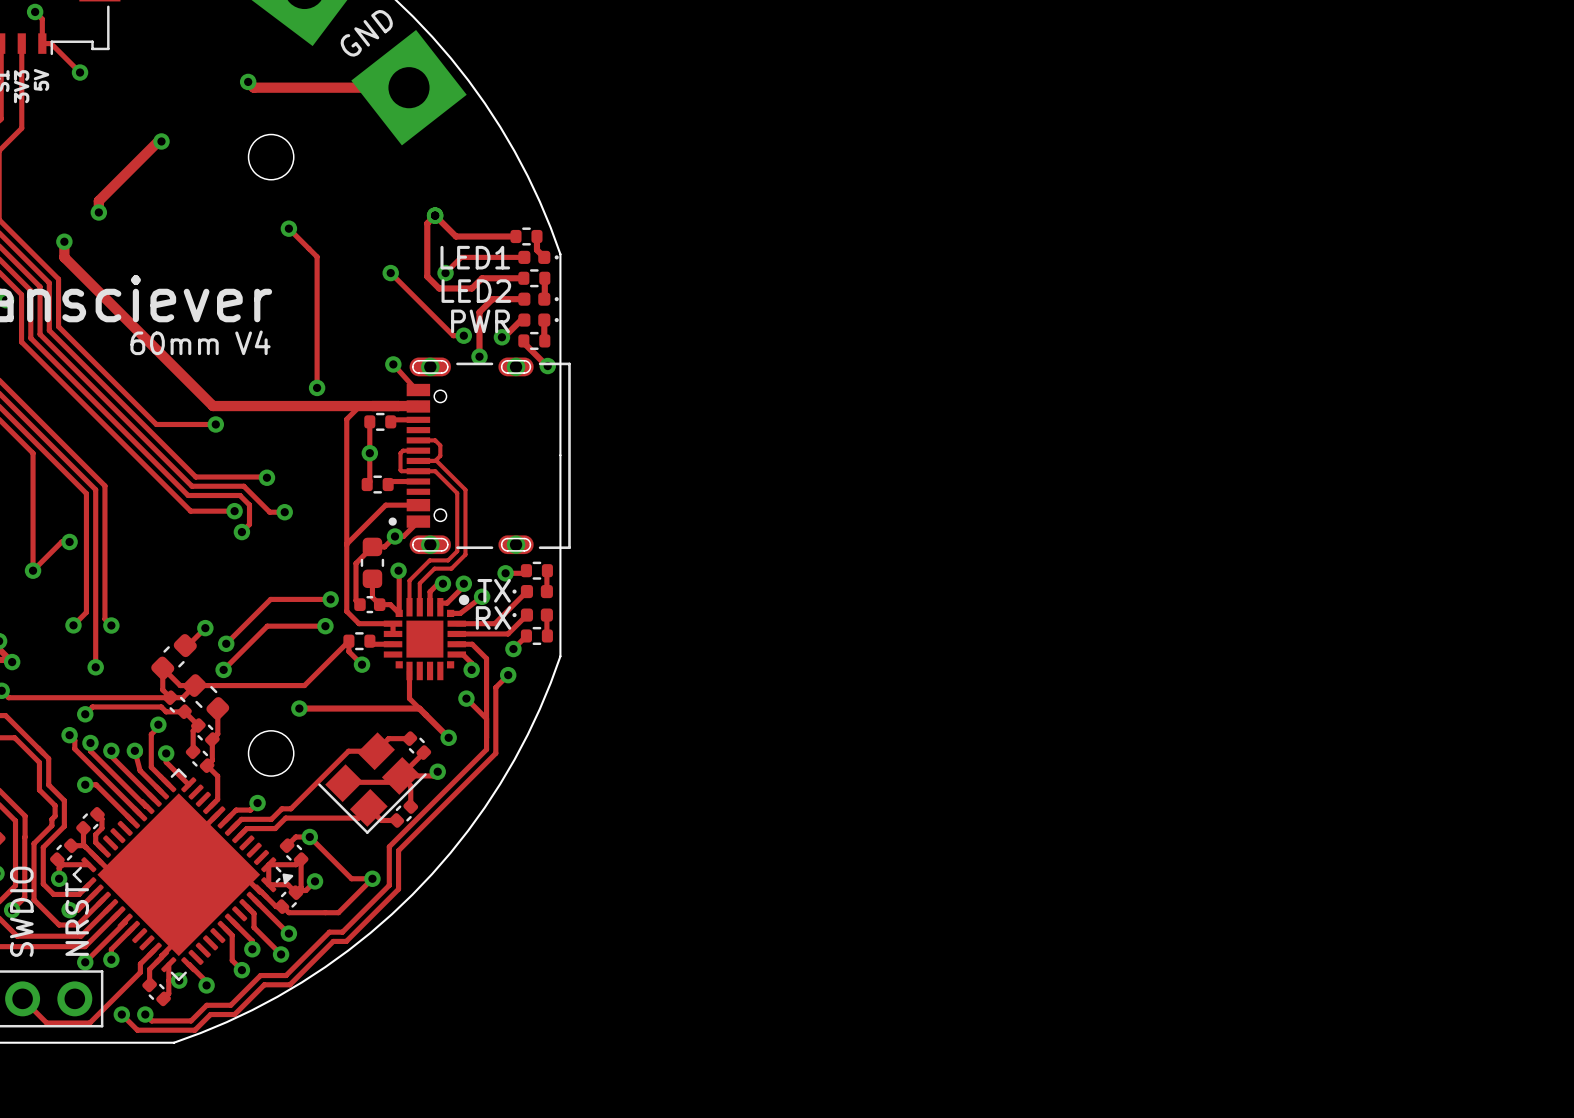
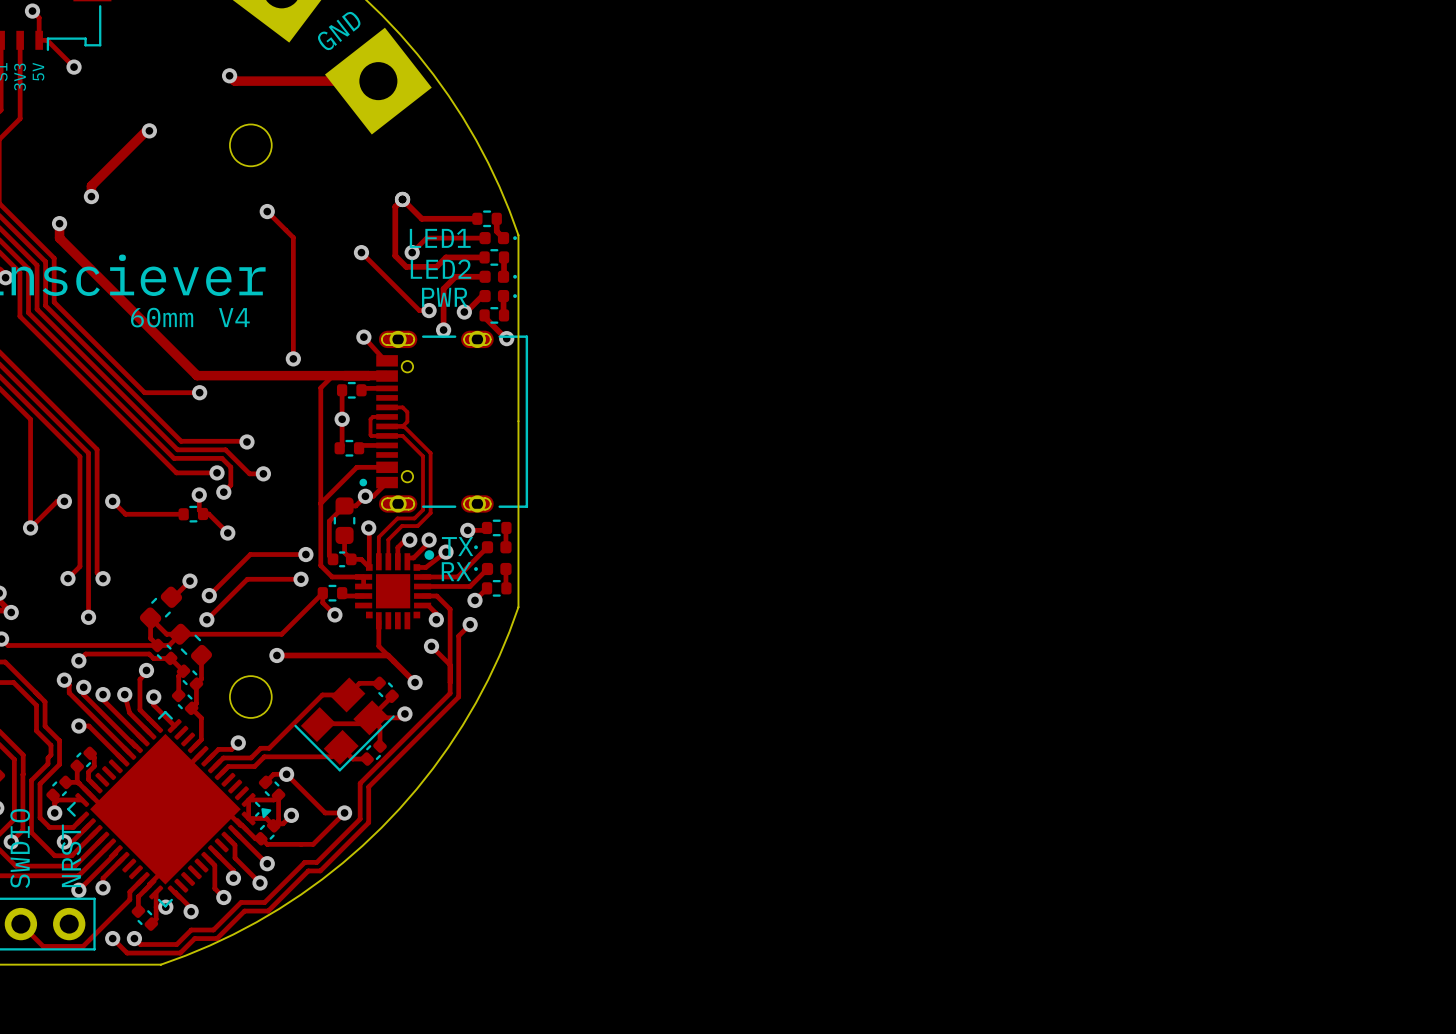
track: none -> (199, 494) (199, 510) (203, 514) (208, 514) (227, 533)
via: none -> (199, 494)
track: none -> (112, 501) (125, 514) (183, 514)
via: none -> (112, 501)
part: none -> (193, 514)
via: none -> (227, 533)

